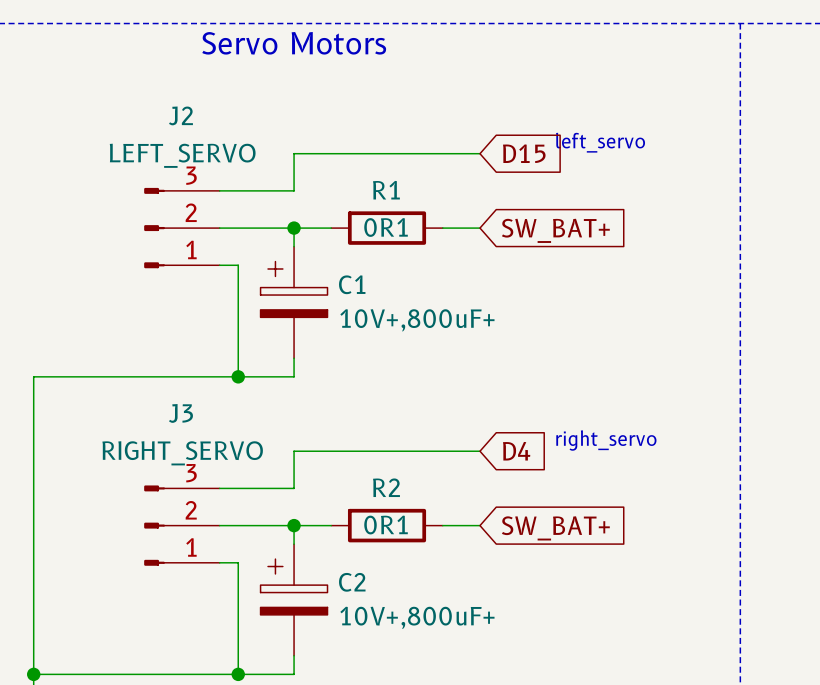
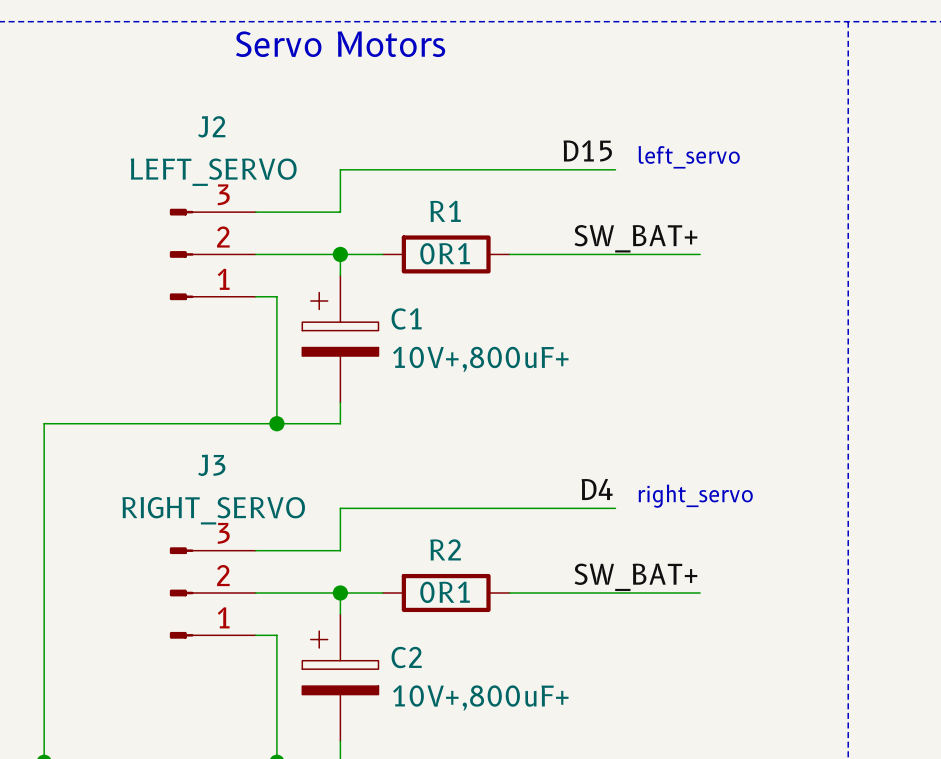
label: none -> D15 (587, 150)
wire: none -> (551, 169) (615, 169)
global label: D15 (524, 153) -> none
label: none -> SW_BAT+ (635, 238)
wire: none -> (551, 254) (700, 254)
global label: SW_BAT+ (555, 230) -> none
label: none -> D4 (597, 489)
wire: none -> (551, 508) (615, 508)
global label: D4 (516, 451) -> none
label: none -> SW_BAT+ (635, 577)
wire: none -> (551, 593) (700, 593)
global label: SW_BAT+ (555, 528) -> none

